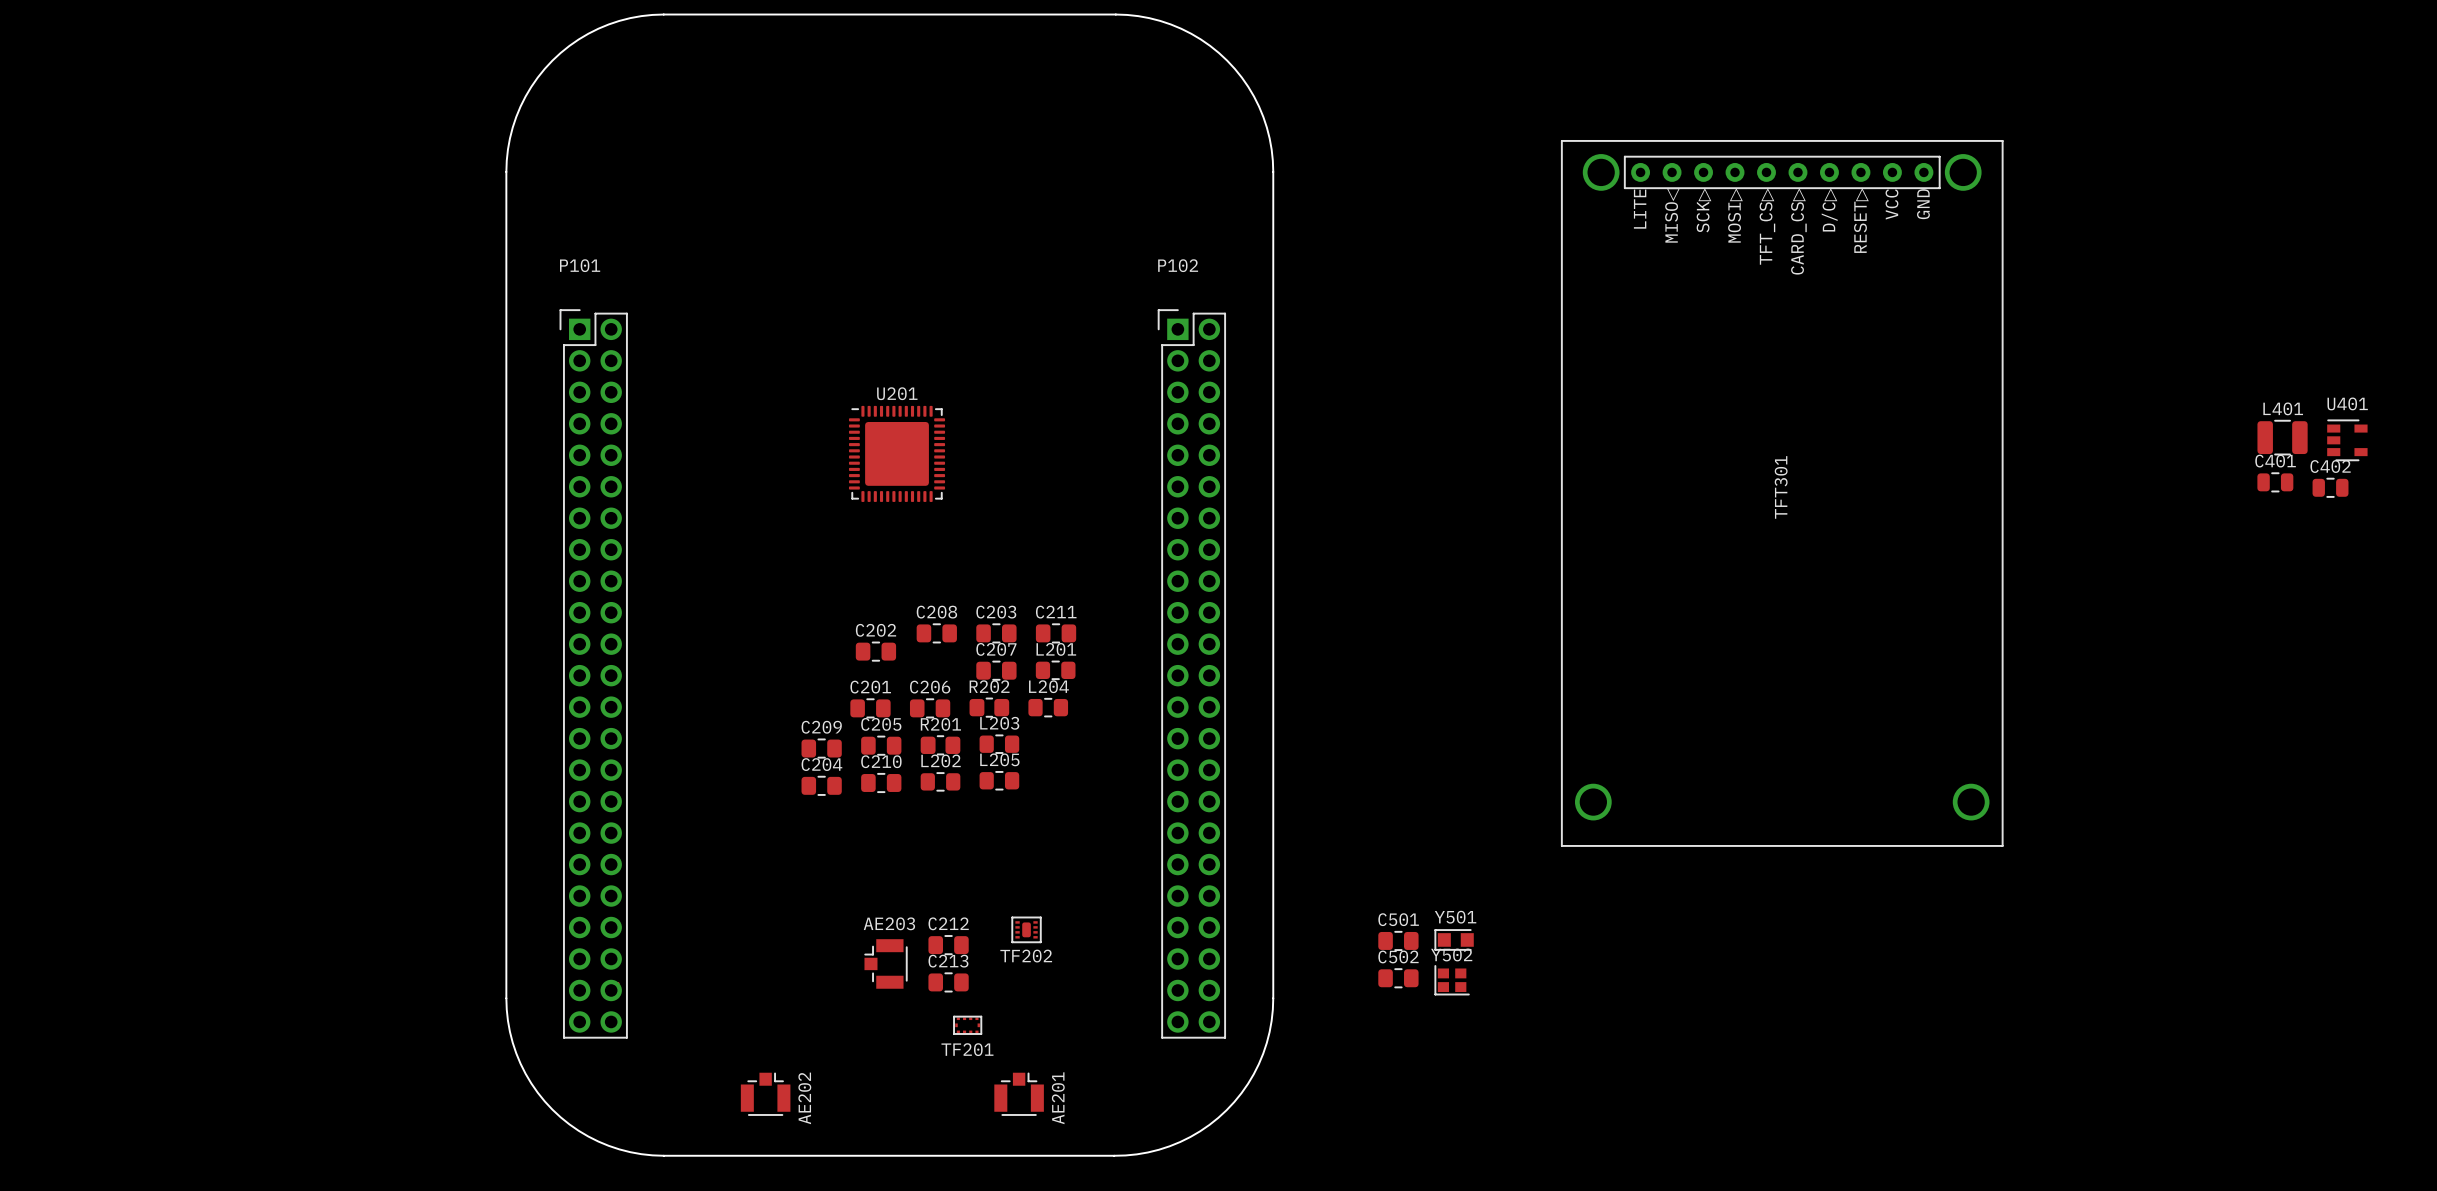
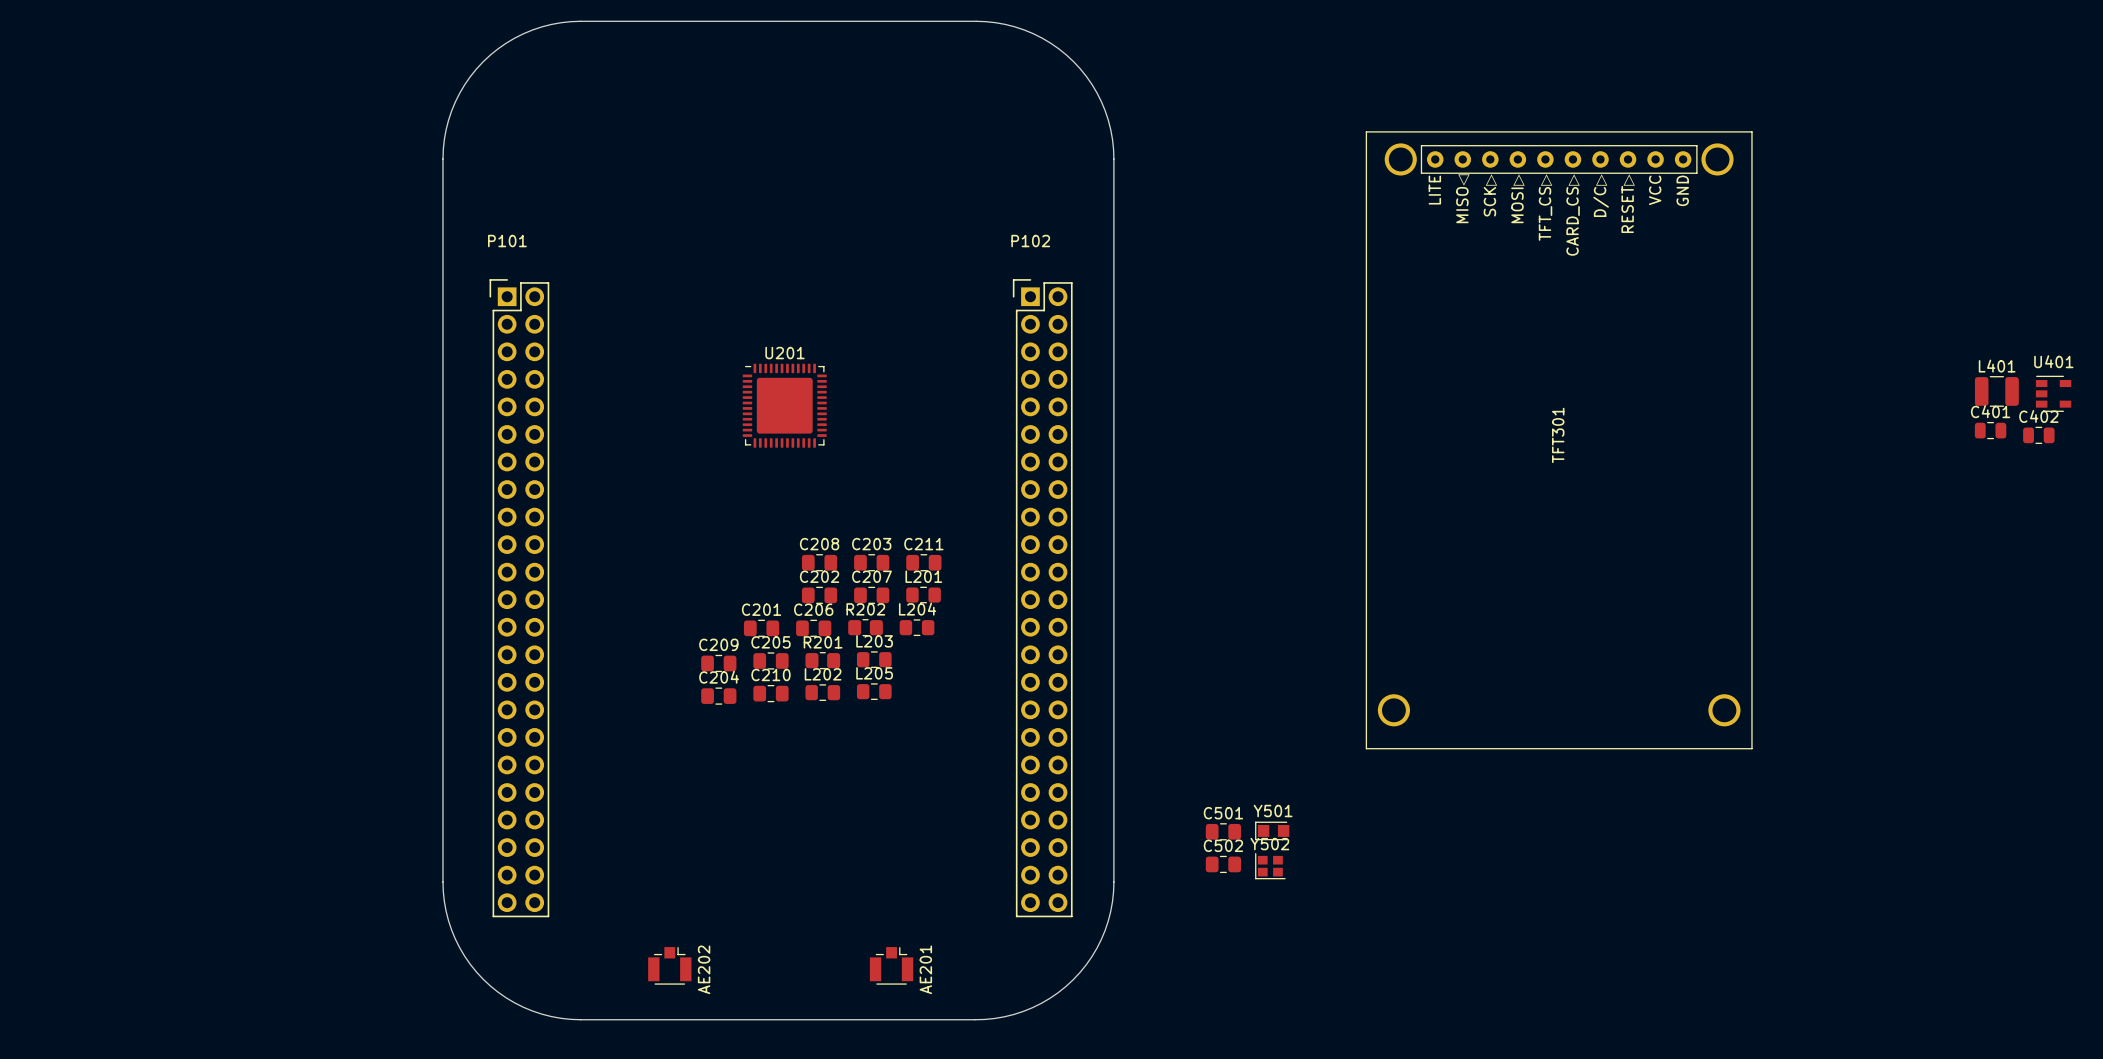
C202 position: (875, 651) -> (819, 595)
TF202: (1026, 929) -> none
C212: (948, 945) -> none
AE203: (885, 963) -> none
C213: (948, 982) -> none
TF201: (967, 1025) -> none

